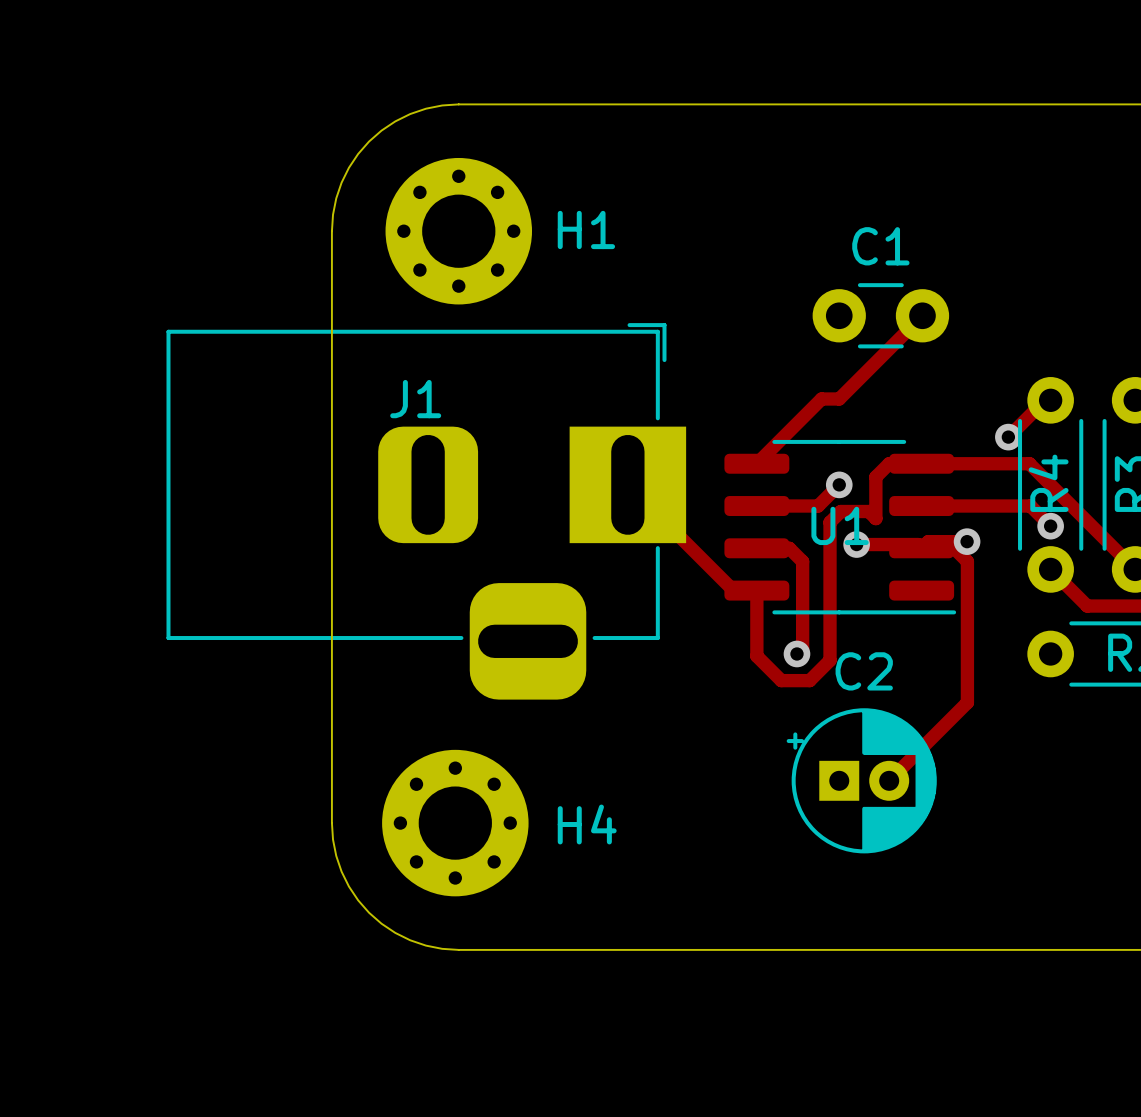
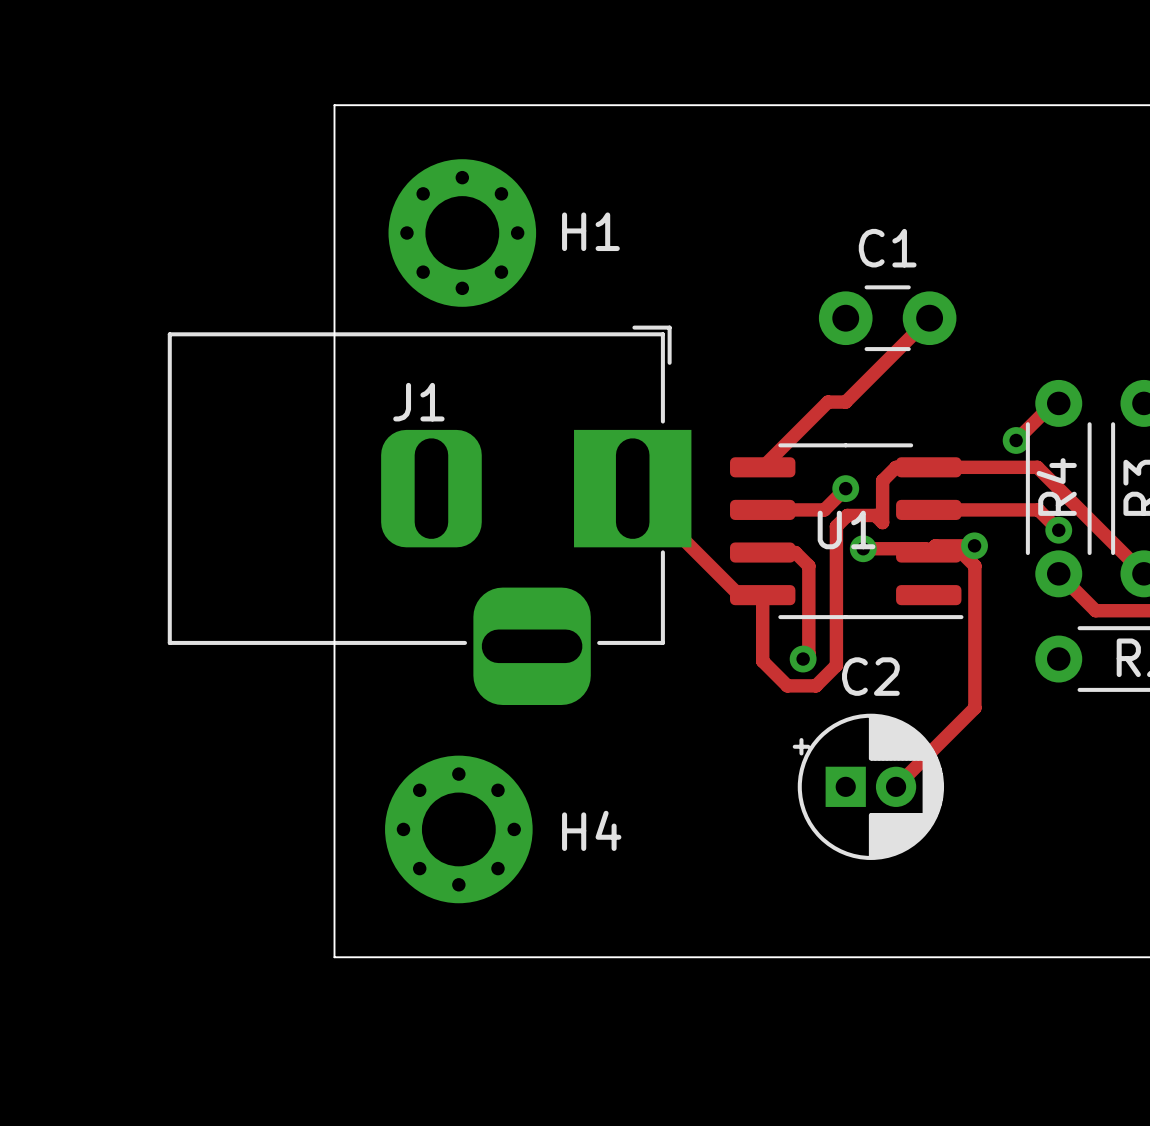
board edge: (458, 104) (425, 108) (410, 114) (381, 130) (369, 141) (358, 154) (341, 182) (336, 198) (331, 231) -> (462, 105) (334, 105) (334, 233)
board edge: (331, 823) (336, 855) (341, 871) (358, 900) (369, 912) (395, 932) (410, 940) (442, 948) (458, 949) -> (334, 829) (334, 957) (462, 957)

